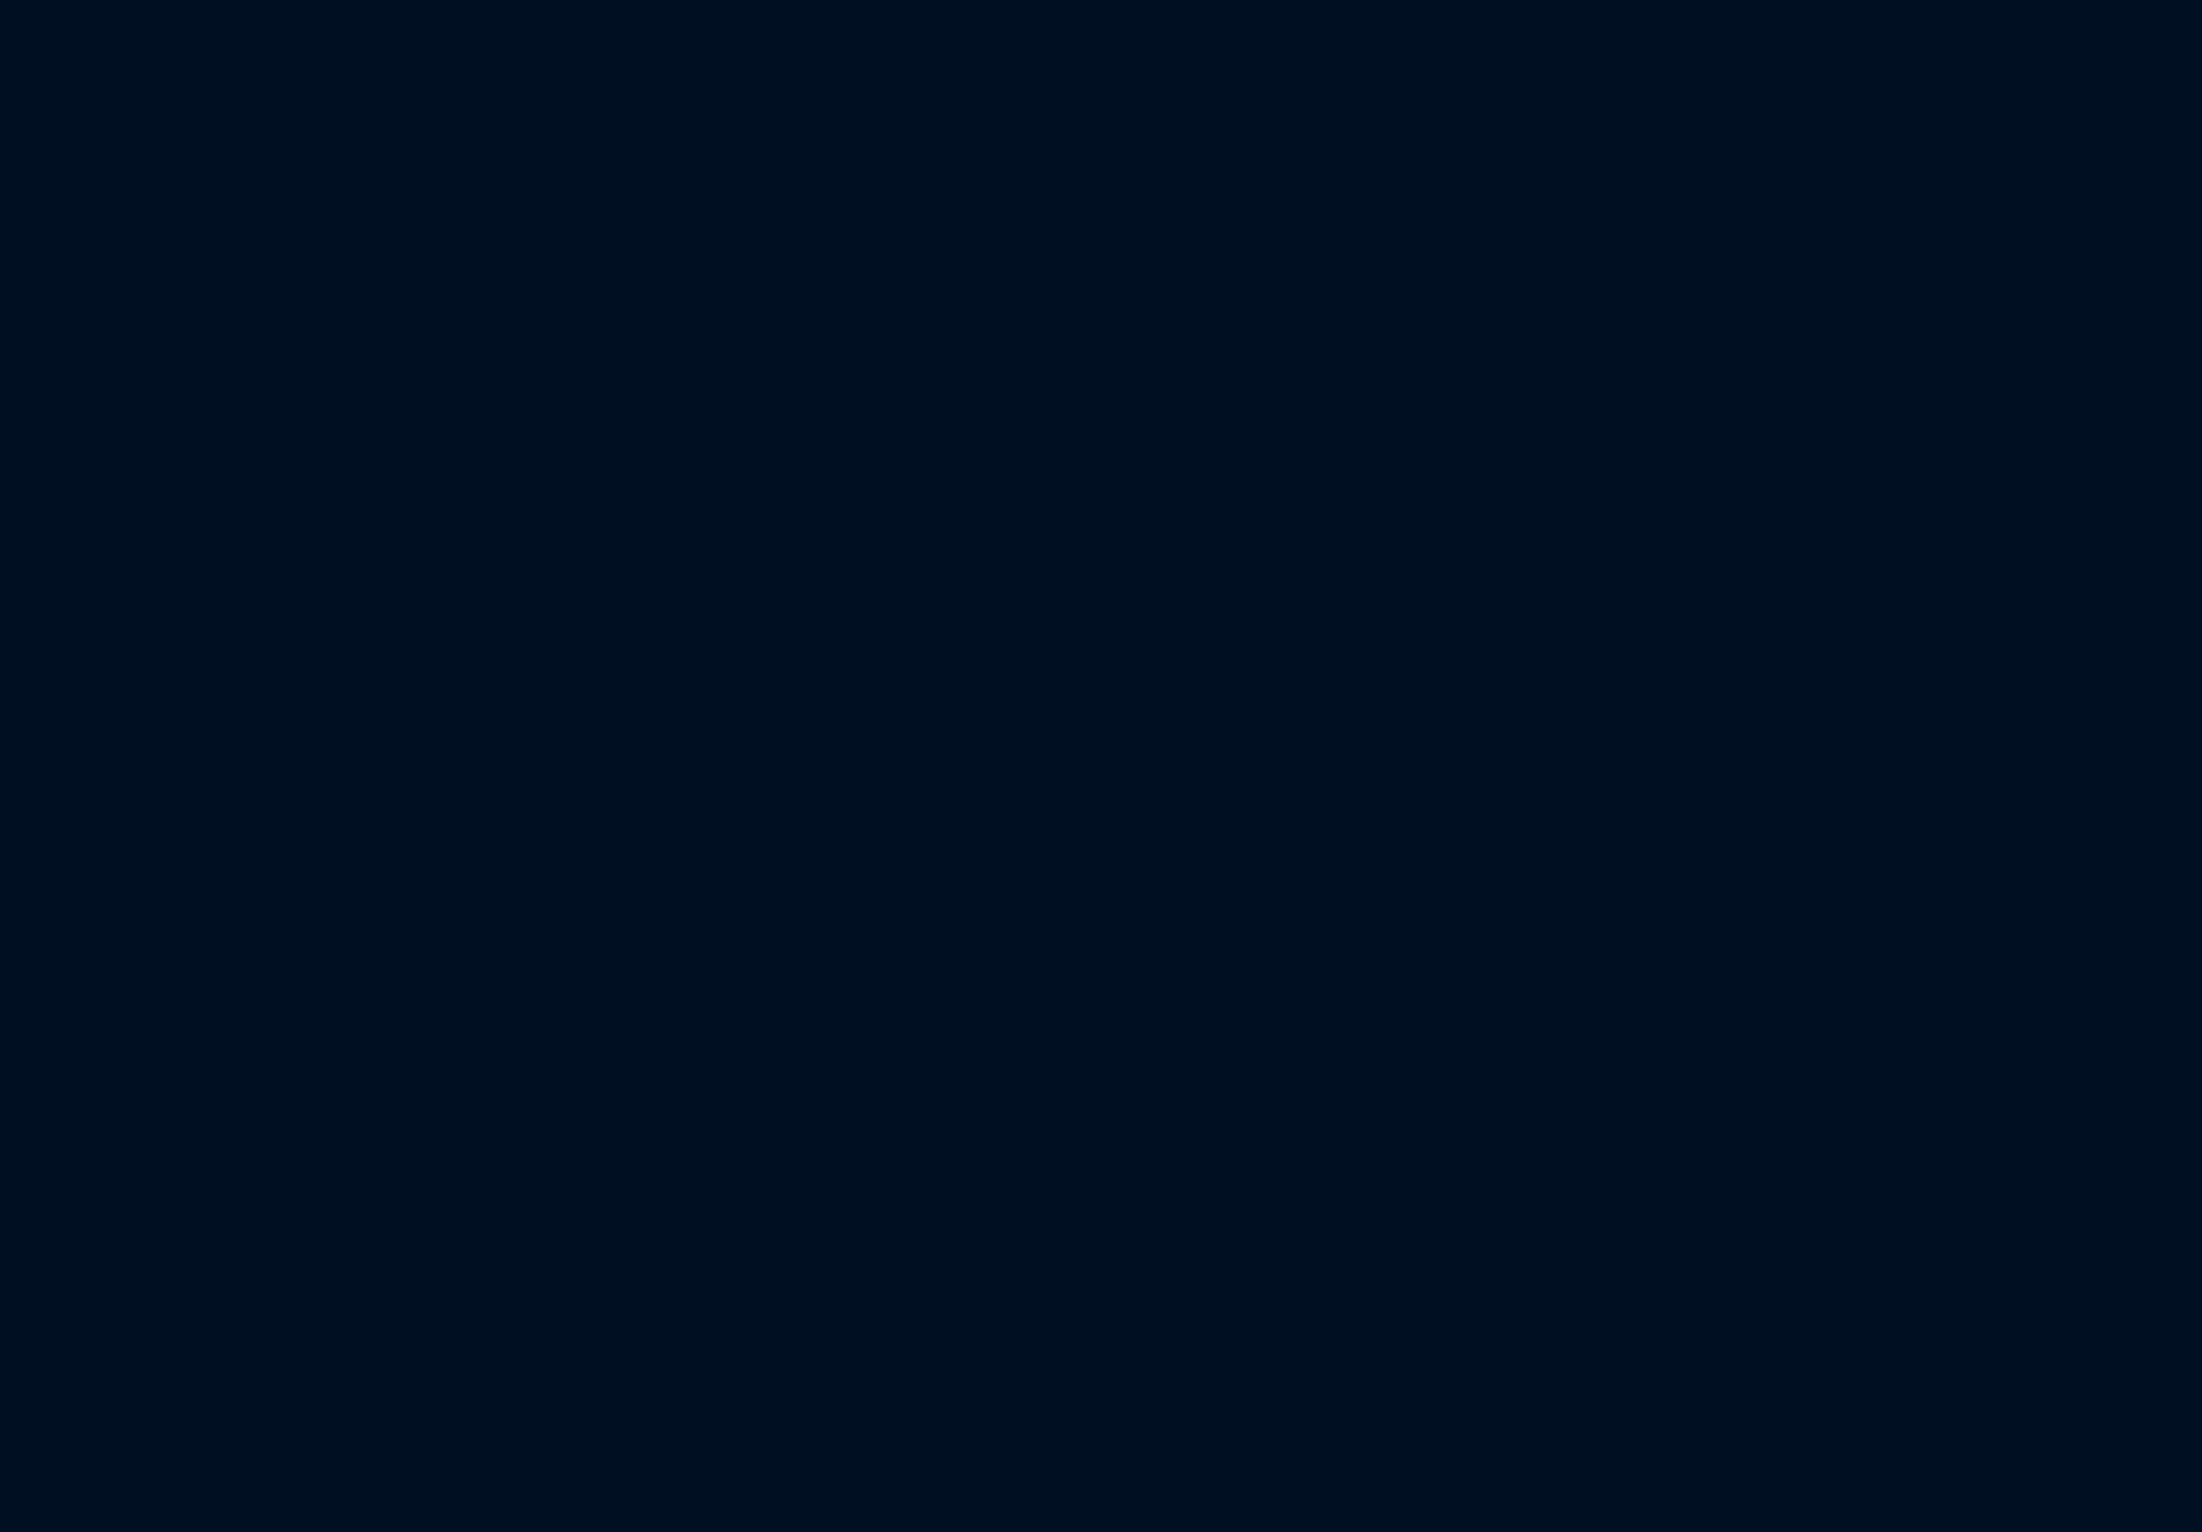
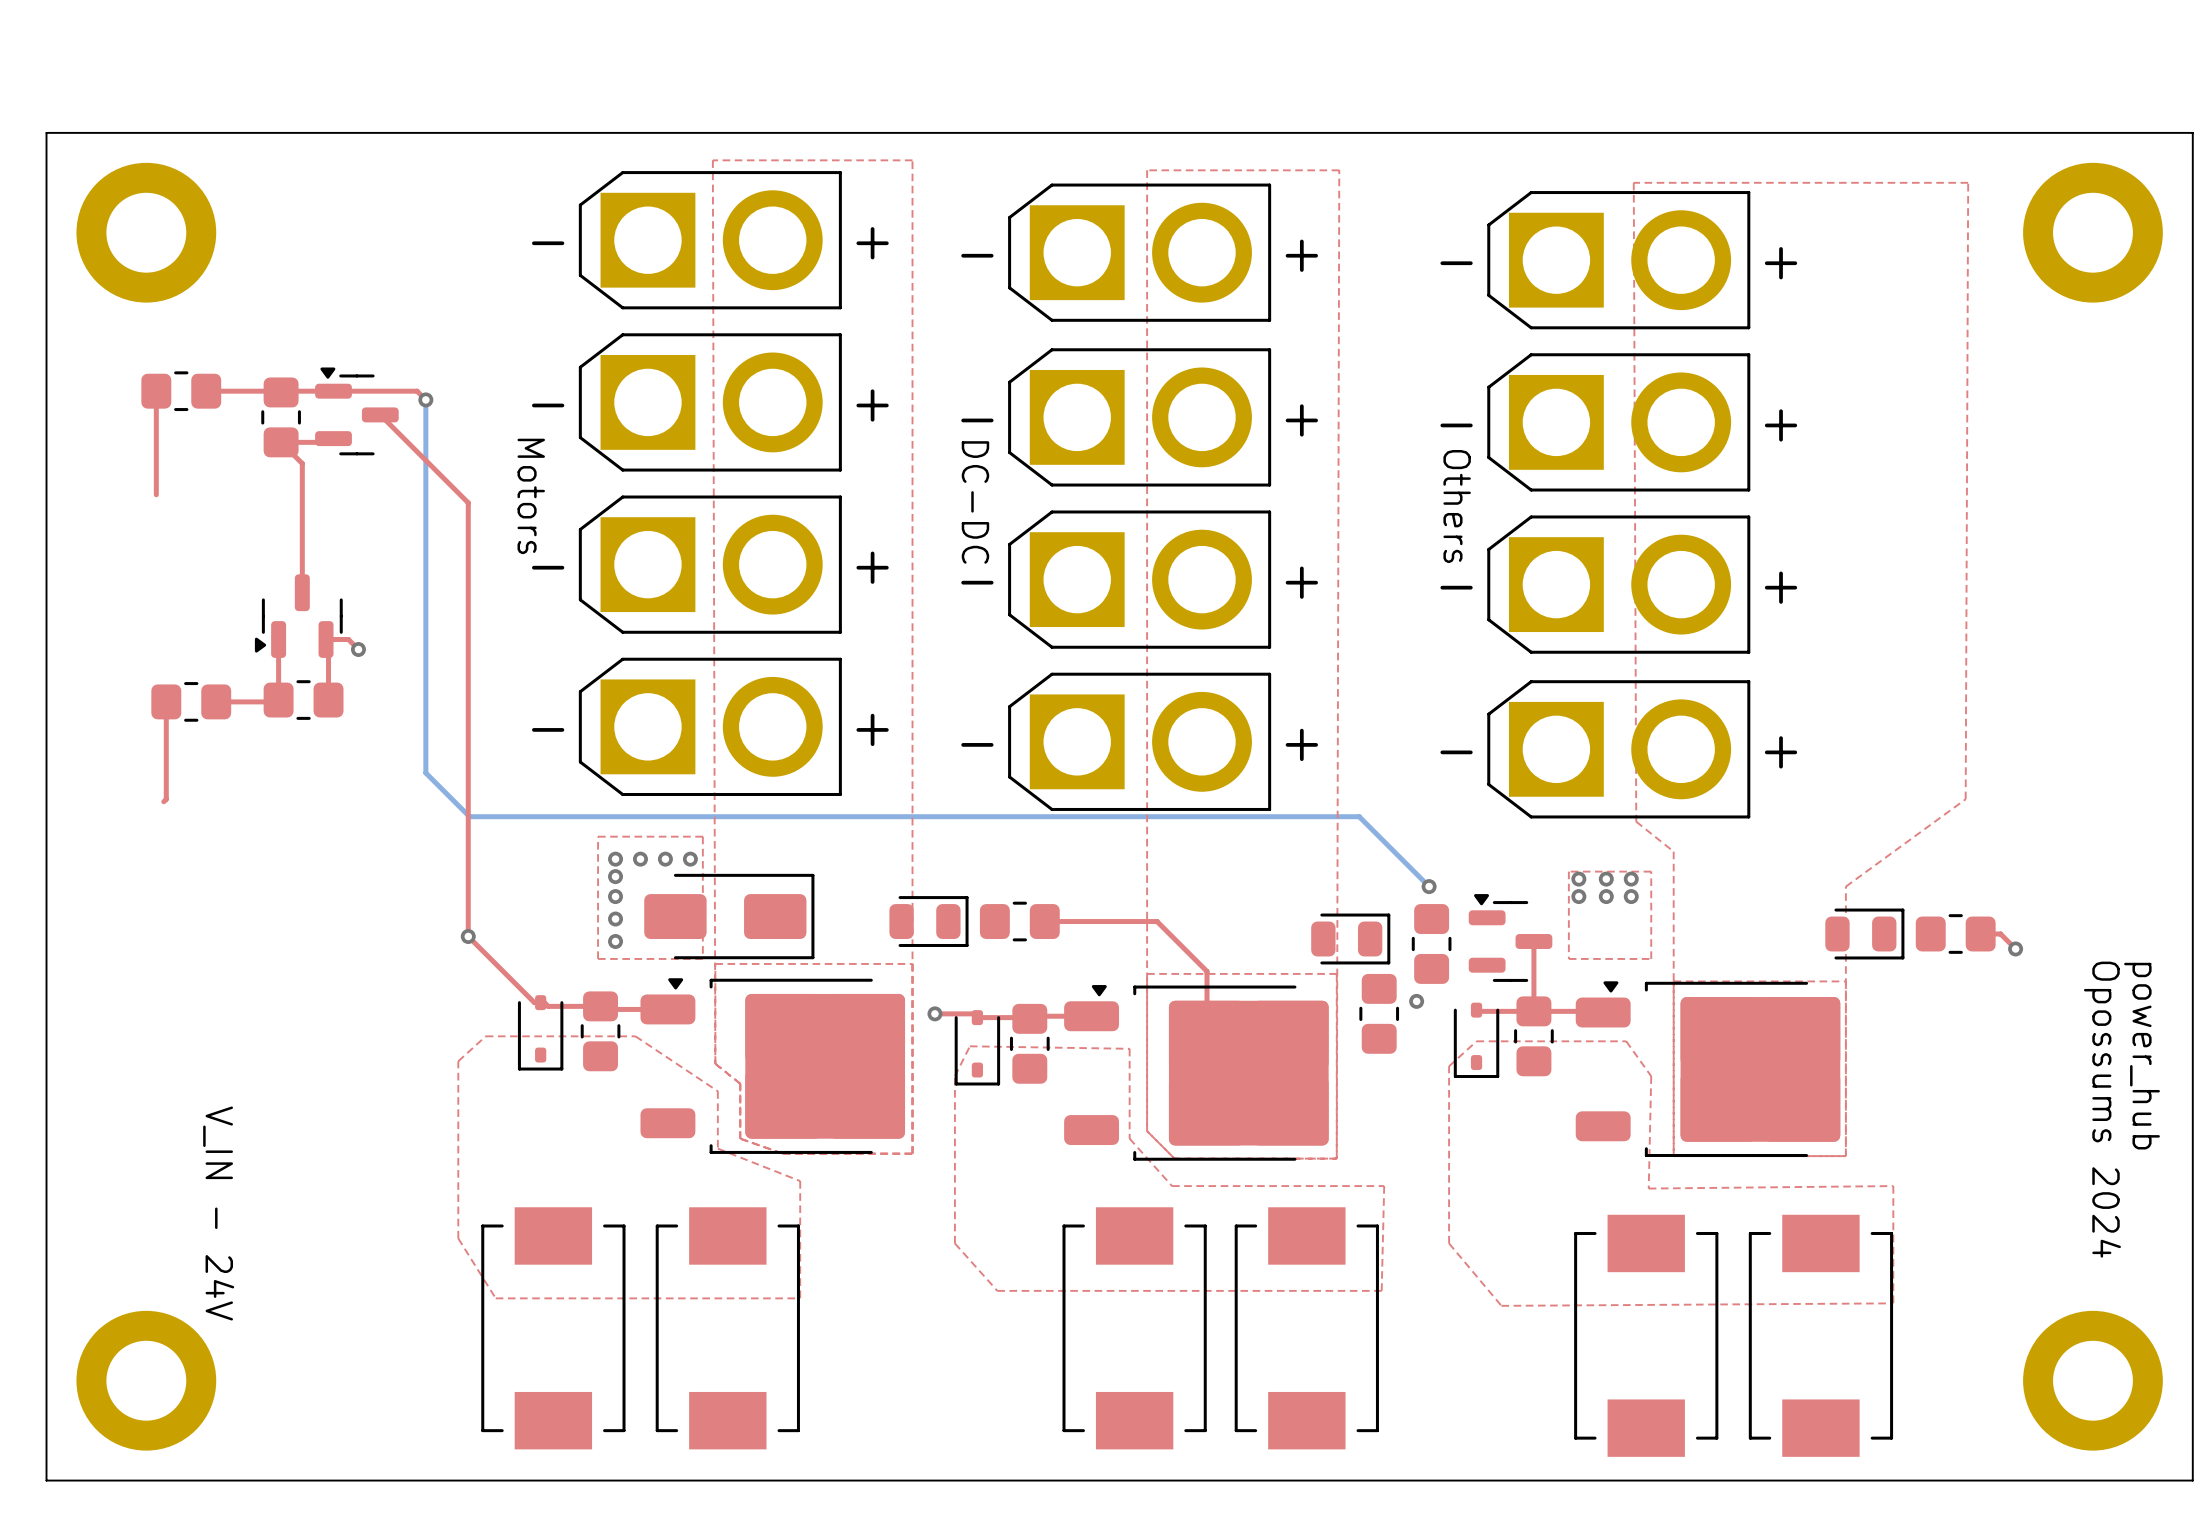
board edge: none -> (46, 132) (2192, 132) (2192, 1480) (46, 1480) (46, 132)
top zone outline: none -> (1633, 182) (1968, 182) (1965, 799) (1845, 886) (1845, 1156) (1673, 1156) (1673, 851) (1636, 821) (1633, 182)
part: none -> (146, 232)
part: none -> (2092, 232)
part: none -> (710, 240)
part: none -> (1139, 252)
part: none -> (1618, 260)
top track: none -> (156, 391) (156, 494)
part: none -> (181, 391)
top track: none -> (206, 391) (417, 391) (425, 399)
bottom track: none -> (425, 399) (425, 772) (469, 816) (1359, 816) (1429, 886)
via: none -> (425, 399)
part: none -> (710, 402)
part: none -> (356, 411)
top track: none -> (380, 414) (468, 502) (468, 936) (534, 1002) (544, 1002) (548, 1006) (603, 1006) (606, 1009) (667, 1009)
part: none -> (281, 417)
part: none -> (1139, 417)
part: none -> (1618, 422)
top track: none -> (333, 438) (329, 442) (281, 442) (302, 463) (302, 592)
text: none -> Motors (531, 496)
text: none -> DC-DC (975, 502)
text: none -> Others (1457, 506)
part: none -> (710, 564)
part: none -> (1139, 579)
part: none -> (1618, 584)
part: none -> (298, 616)
top track: none -> (278, 639) (278, 700) (276, 701) (216, 701)
top track: none -> (358, 649) (348, 639) (326, 639) (328, 642) (328, 700)
via: none -> (358, 649)
part: none -> (303, 700)
top track: none -> (166, 701) (166, 799) (163, 801)
part: none -> (191, 701)
part: none -> (710, 726)
part: none -> (1139, 741)
part: none -> (1618, 749)
top zone outline: none -> (598, 836) (598, 958) (702, 958) (702, 836) (598, 836)
via: none -> (615, 859)
via: none -> (640, 859)
via: none -> (665, 859)
via: none -> (690, 859)
top zone outline: none -> (1568, 871) (1651, 871) (1651, 958) (1568, 958) (1568, 871)
via: none -> (615, 876)
via: none -> (1578, 879)
via: none -> (1606, 879)
via: none -> (1631, 879)
via: none -> (1429, 886)
via: none -> (615, 896)
via: none -> (1578, 896)
via: none -> (1606, 896)
via: none -> (1631, 896)
part: none -> (729, 916)
via: none -> (615, 919)
part: none -> (928, 921)
part: none -> (1019, 921)
top track: none -> (1044, 921) (1157, 921) (1207, 971) (1207, 1035)
part: none -> (1864, 934)
part: none -> (1955, 934)
top track: none -> (1980, 934) (2000, 934) (2015, 948)
via: none -> (468, 936)
part: none -> (1350, 938)
part: none -> (1510, 938)
via: none -> (615, 941)
top track: none -> (1533, 941) (1533, 1011)
part: none -> (1431, 943)
via: none -> (2015, 948)
top zone outline: none -> (912, 963) (715, 963) (715, 1063)
top zone outline: none -> (1147, 973) (1336, 973) (1336, 1158)
top zone outline: none -> (1673, 981) (1845, 981)
via: none -> (1416, 1001)
top track: none -> (1476, 1010) (1603, 1012)
top track: none -> (934, 1013) (973, 1013) (977, 1017) (1029, 1018) (1032, 1016) (1091, 1016)
via: none -> (934, 1013)
part: none -> (1379, 1013)
part: none -> (600, 1031)
part: none -> (540, 1032)
top zone outline: none -> (485, 1036) (458, 1061) (458, 1238) (495, 1298) (800, 1298) (800, 1181) (717, 1148) (717, 1091) (635, 1036) (485, 1036)
part: none -> (1533, 1036)
part: none -> (1476, 1040)
top zone outline: none -> (1476, 1041) (1449, 1066) (1449, 1243) (1501, 1305) (1893, 1303) (1893, 1186) (1648, 1188) (1651, 1076) (1626, 1041) (1476, 1041)
part: none -> (1029, 1043)
top zone outline: none -> (969, 1046) (954, 1076) (954, 1243) (997, 1290) (1381, 1290) (1384, 1186) (1172, 1186) (1129, 1138) (1129, 1048) (969, 1046)
part: none -> (977, 1047)
text: none -> power_hub (2142, 1056)
top zone outline: none -> (715, 1063) (712, 160) (912, 160) (912, 1153) (782, 1153) (740, 1138) (740, 1083) (715, 1063)
part: none -> (772, 1066)
part: none -> (1708, 1069)
part: none -> (1196, 1072)
text: none -> Opossums 2024 (2102, 1109)
top zone outline: none -> (1336, 1158) (1339, 170) (1147, 170) (1147, 1131) (1174, 1158) (1336, 1158)
text: none -> V_IN - 24V (218, 1213)
part: none -> (553, 1328)
part: none -> (727, 1328)
part: none -> (1134, 1328)
part: none -> (1306, 1328)
part: none -> (1646, 1335)
part: none -> (1820, 1335)
part: none -> (146, 1380)
part: none -> (2092, 1380)

